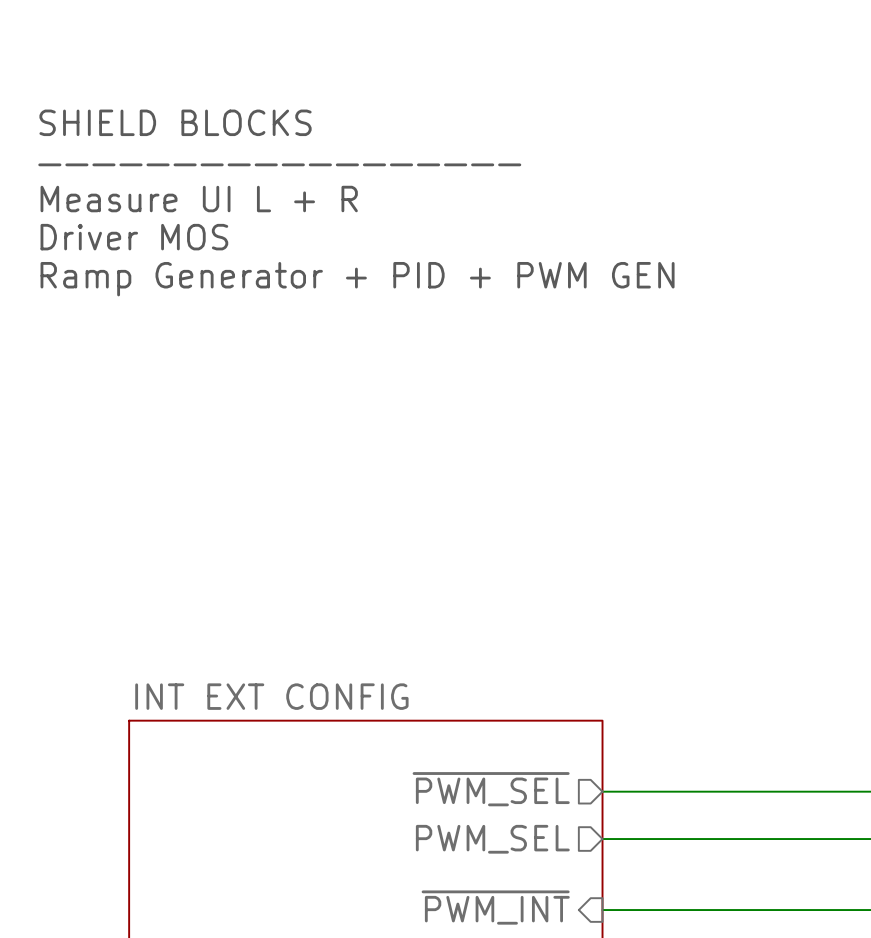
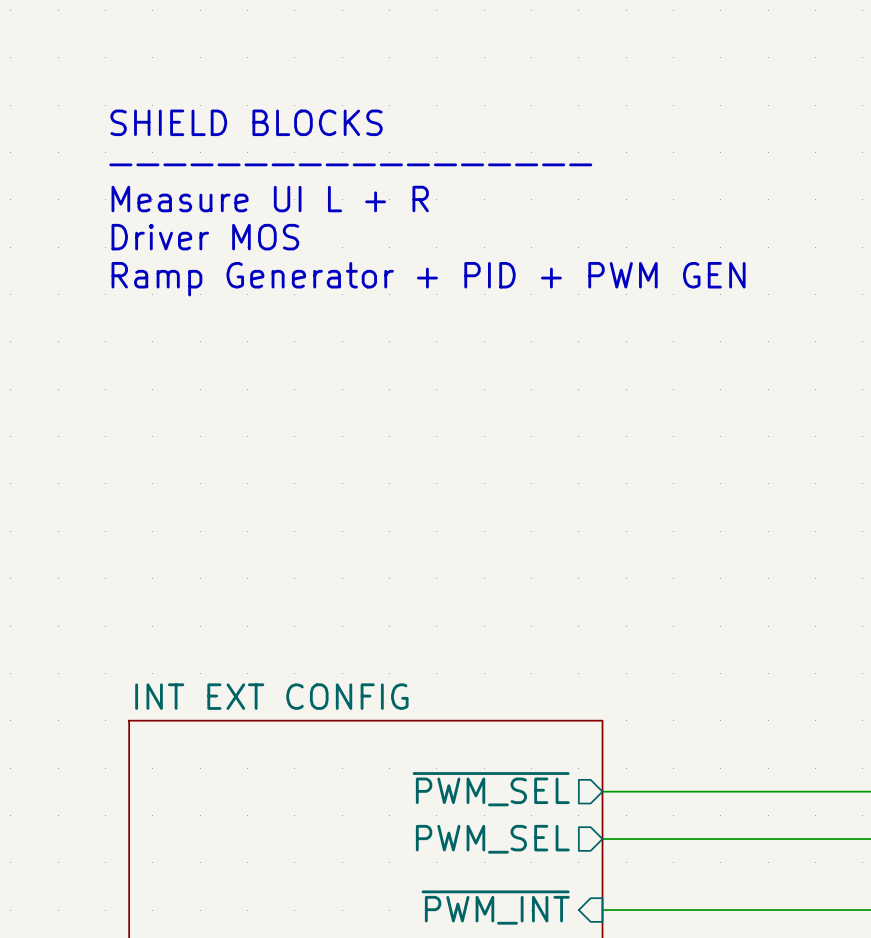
text position: SHIELD BLOCKS (175, 122) -> SHIELD BLOCKS (246, 122)
text position: —————————————————— (279, 164) -> —————————————————— (350, 164)
text position: Measure UI L + R (199, 199) -> Measure UI L + R (270, 199)
text position: Driver MOS (134, 237) -> Driver MOS (205, 237)
text position: Ramp Generator + PID + PWM GEN (357, 279) -> Ramp Generator + PID + PWM GEN (428, 279)

